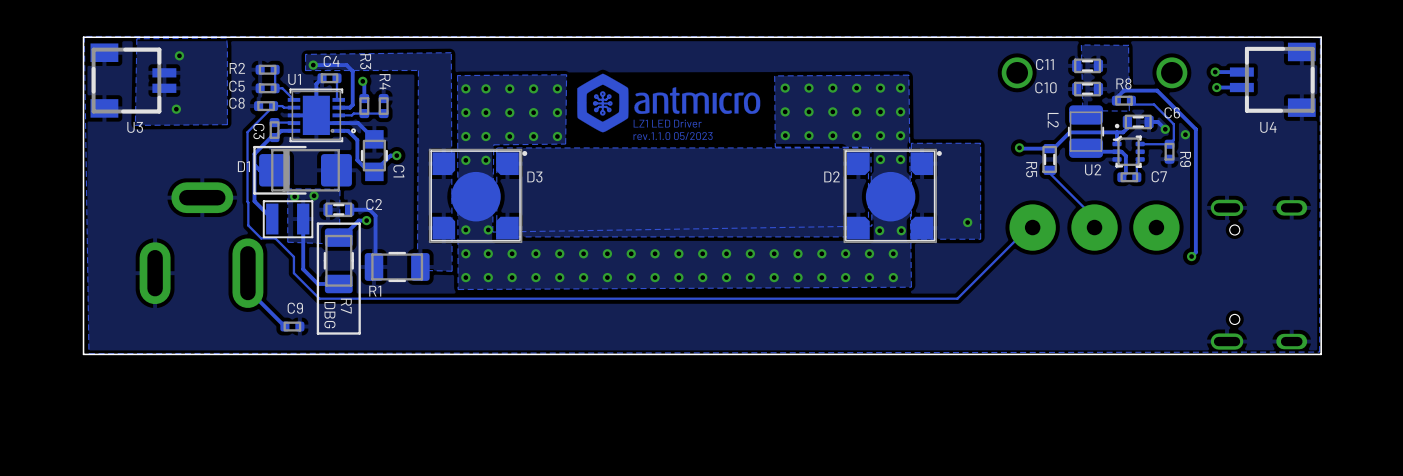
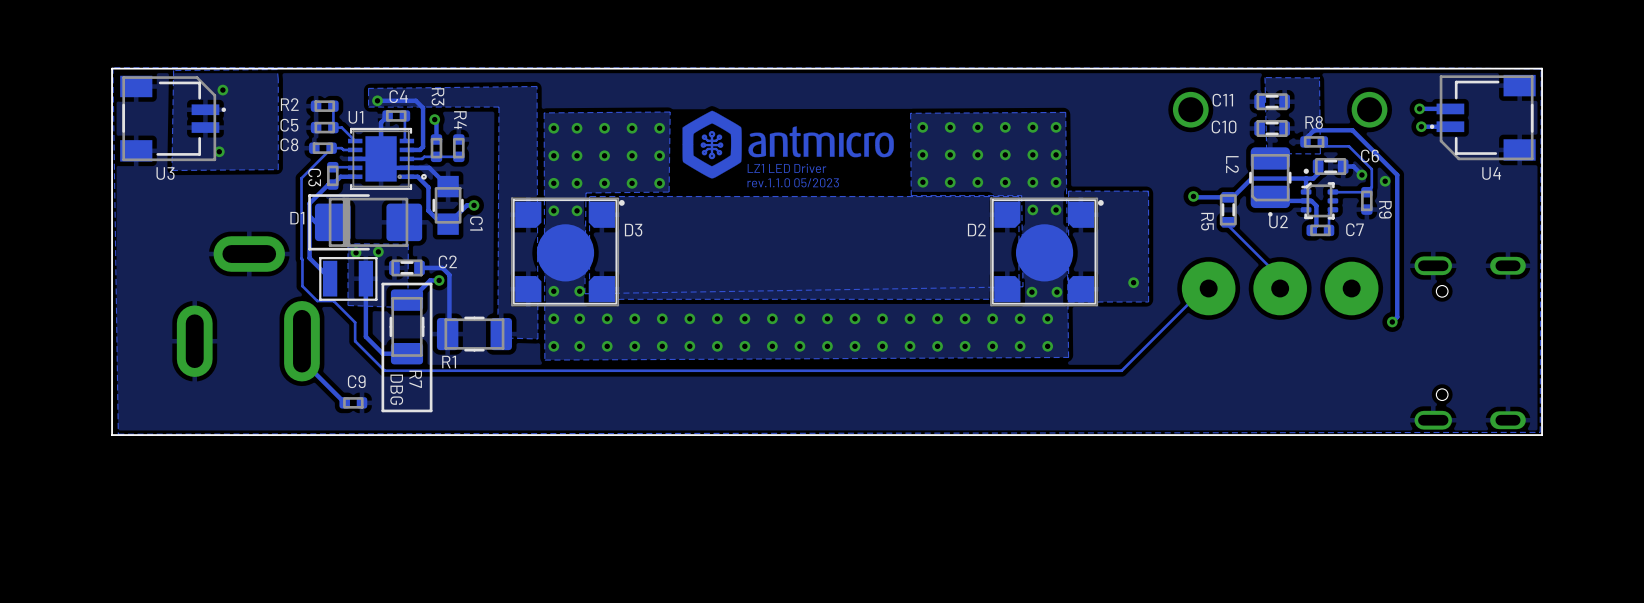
U4 footprint: [1229, 42, 1316, 117] -> [1429, 74, 1536, 161]
U3 footprint: [90, 43, 177, 118] -> [120, 75, 226, 162]
L2 footprint: [1067, 105, 1105, 158] -> [1249, 147, 1292, 217]

